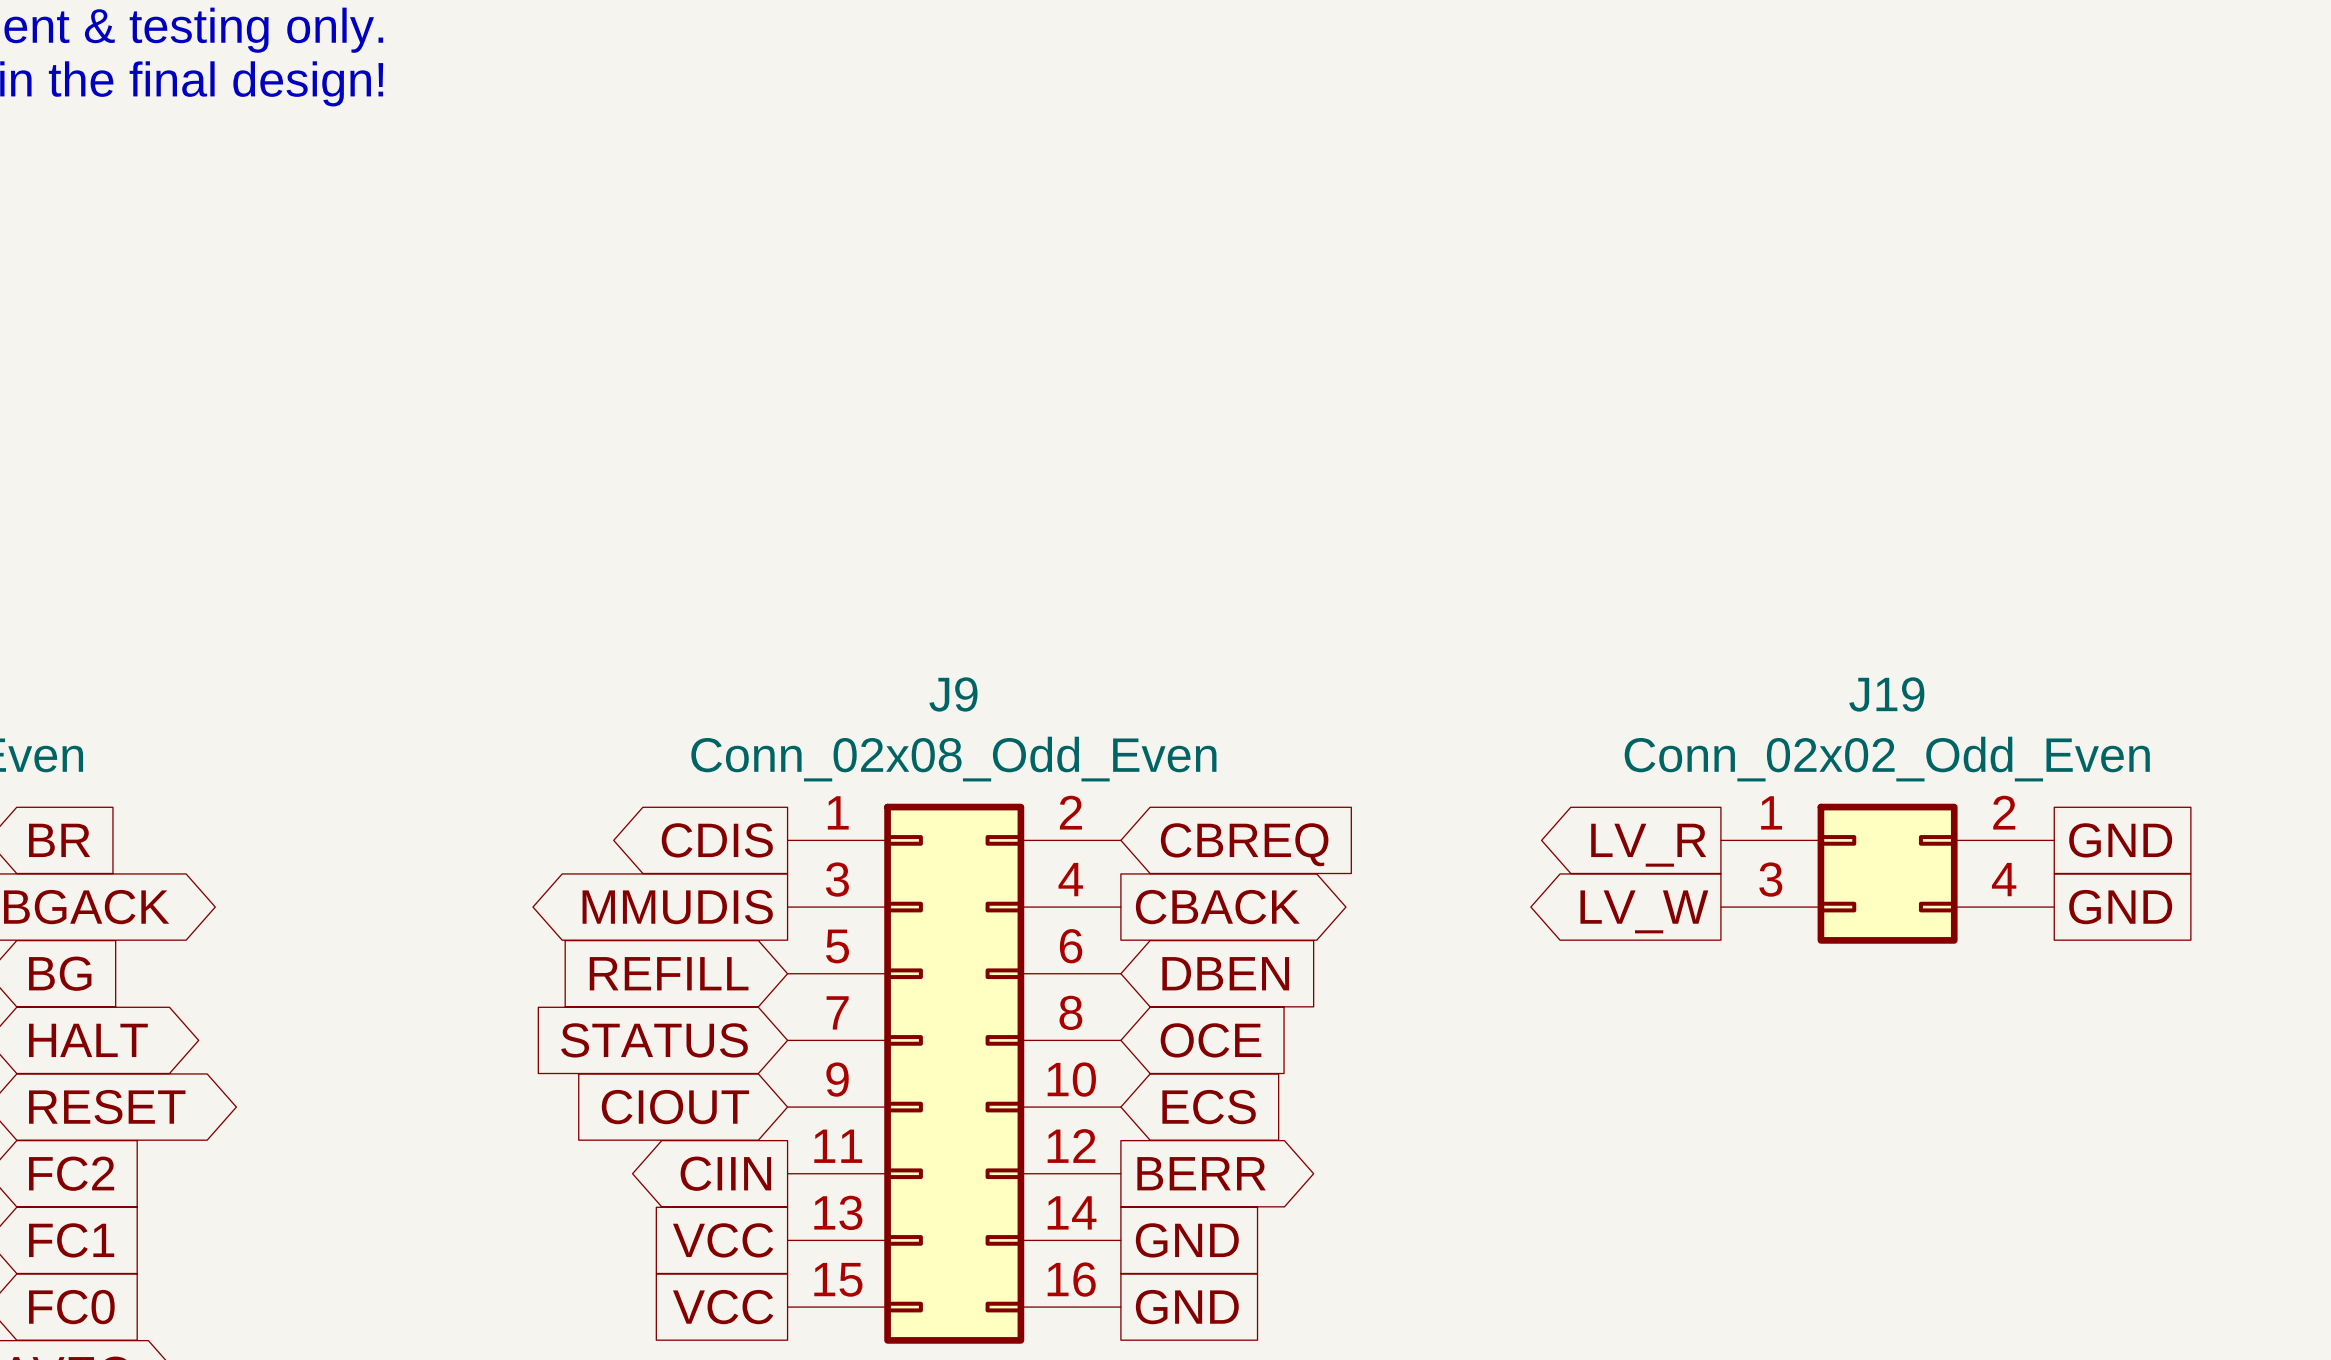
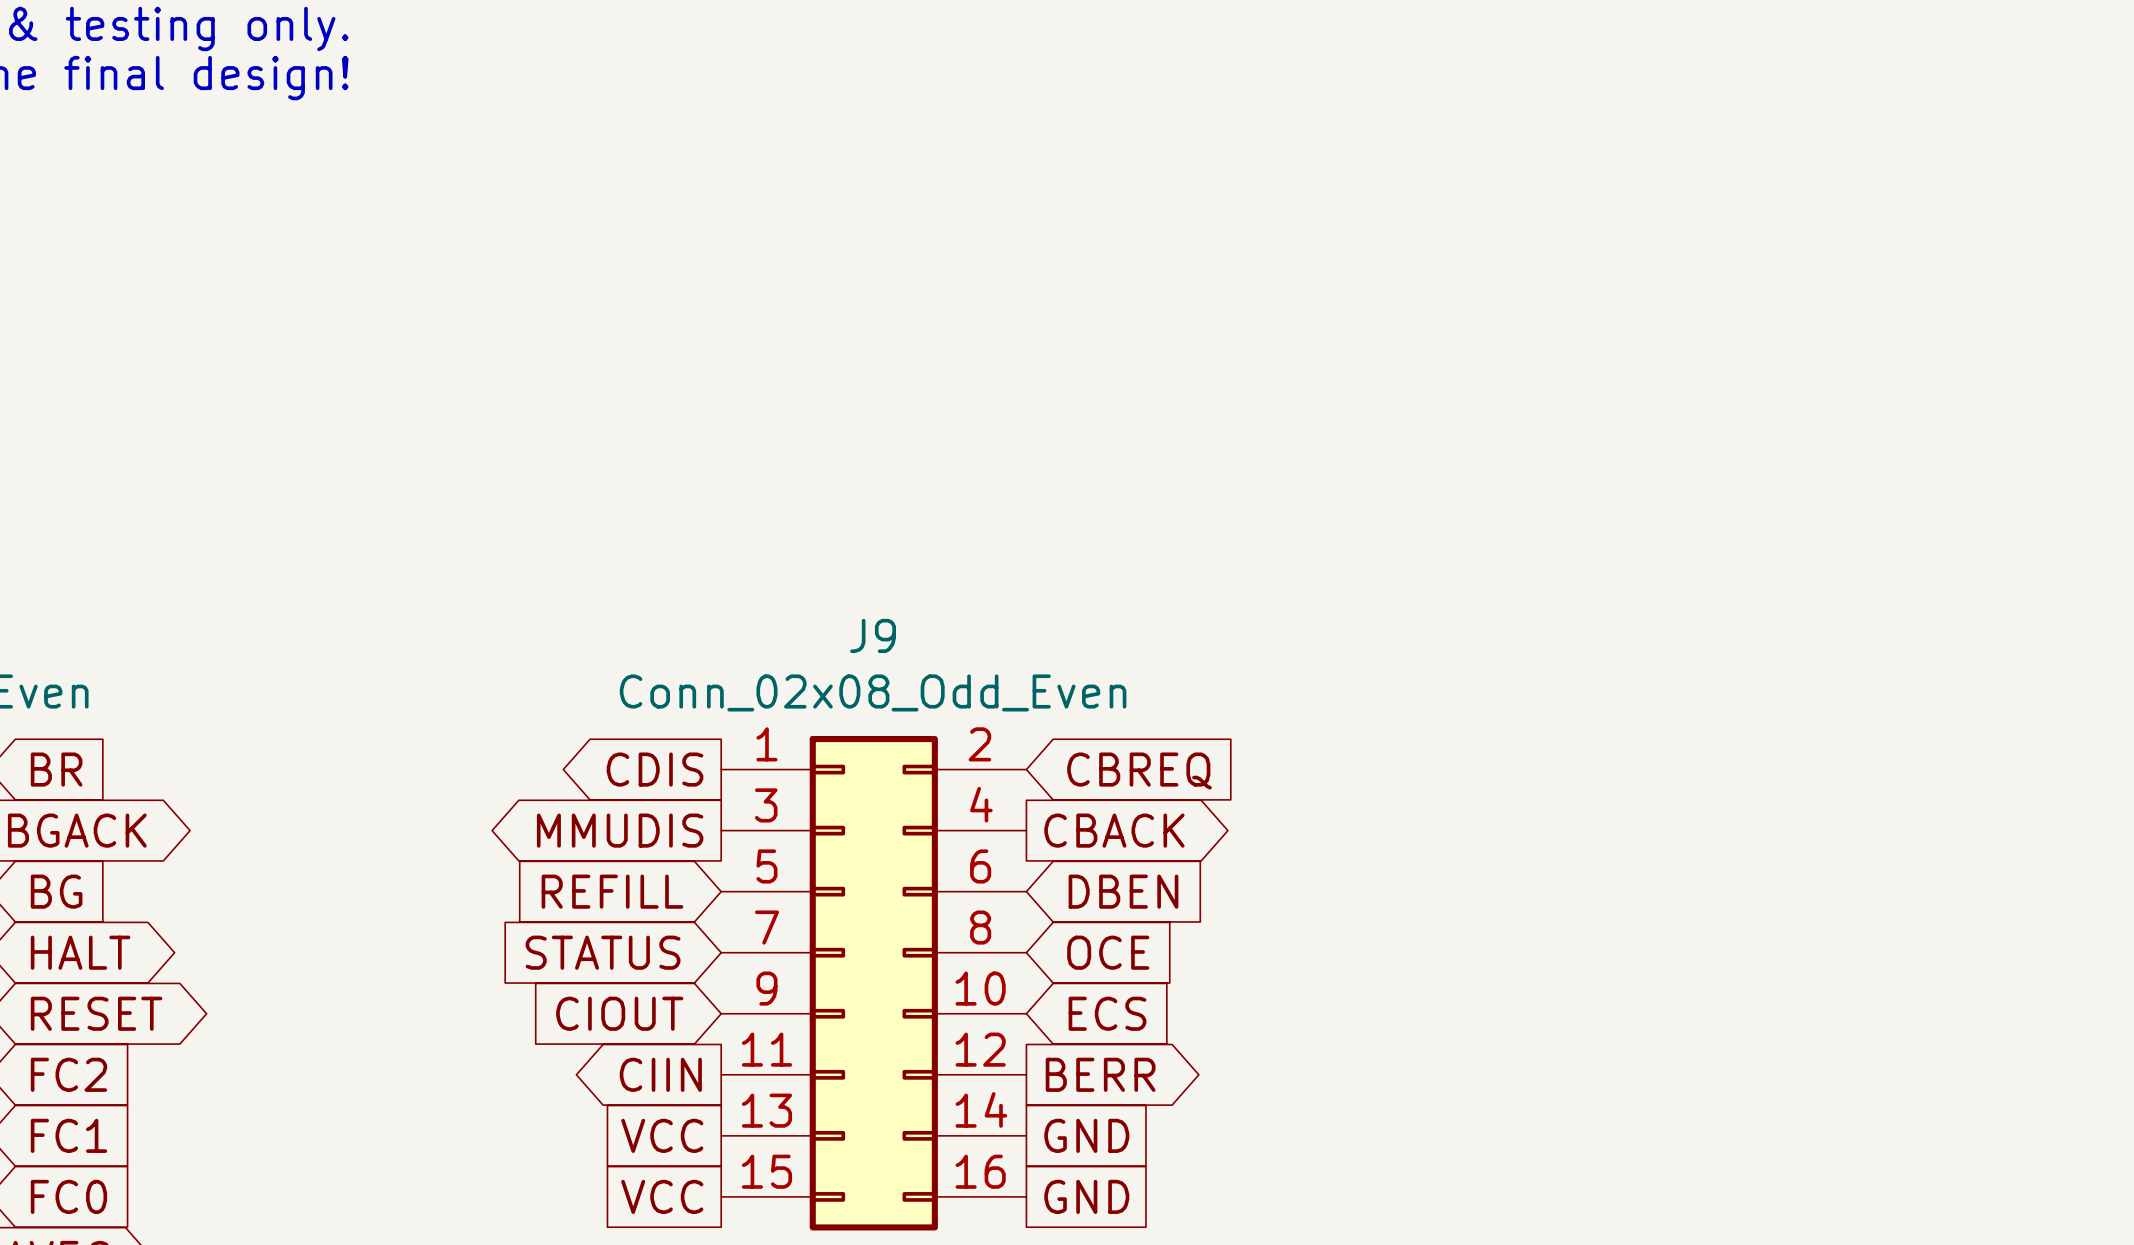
global label: GND (2120, 840) -> none
global label: LV_R (1648, 845) -> none
J19: Conn_02x02_Odd_Even (1887, 873) -> none
global label: GND (2120, 907) -> none
global label: LV_W (1644, 911) -> none

